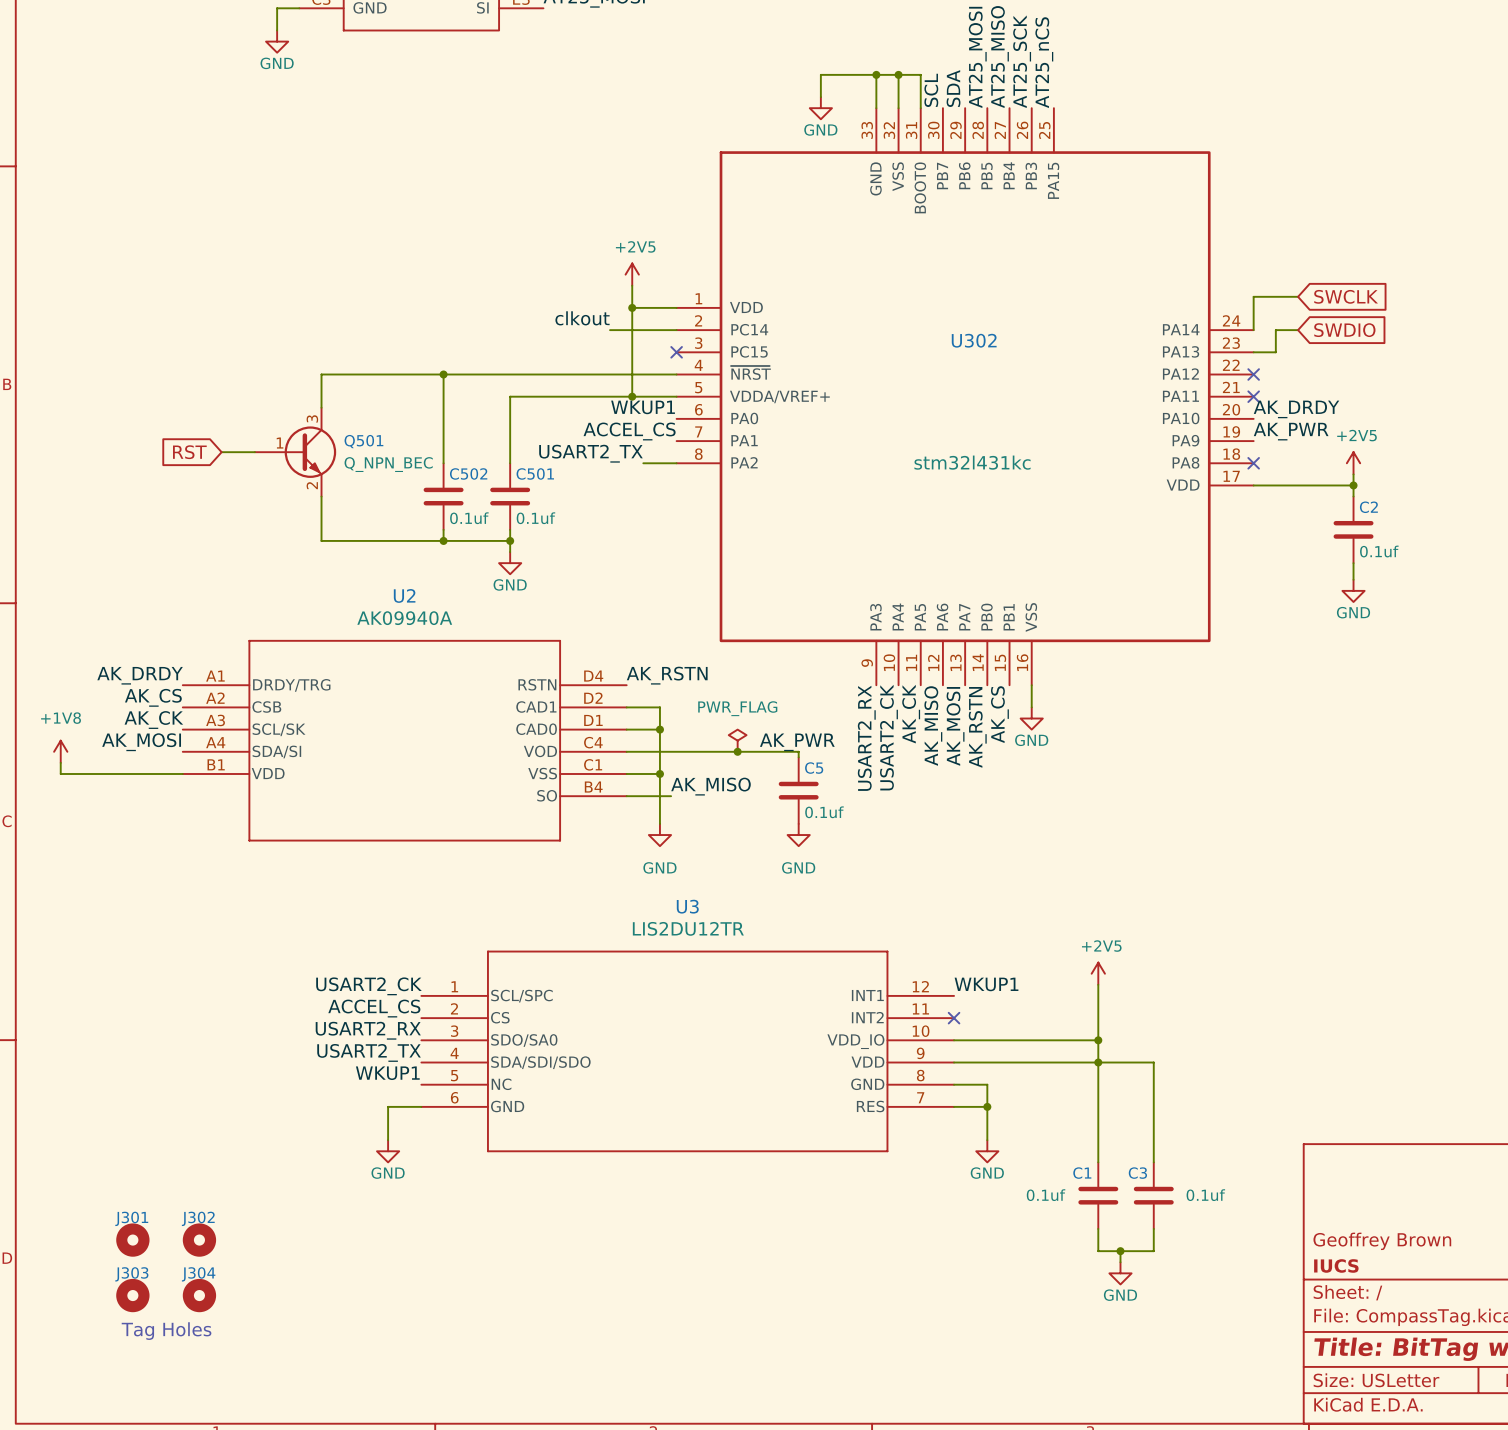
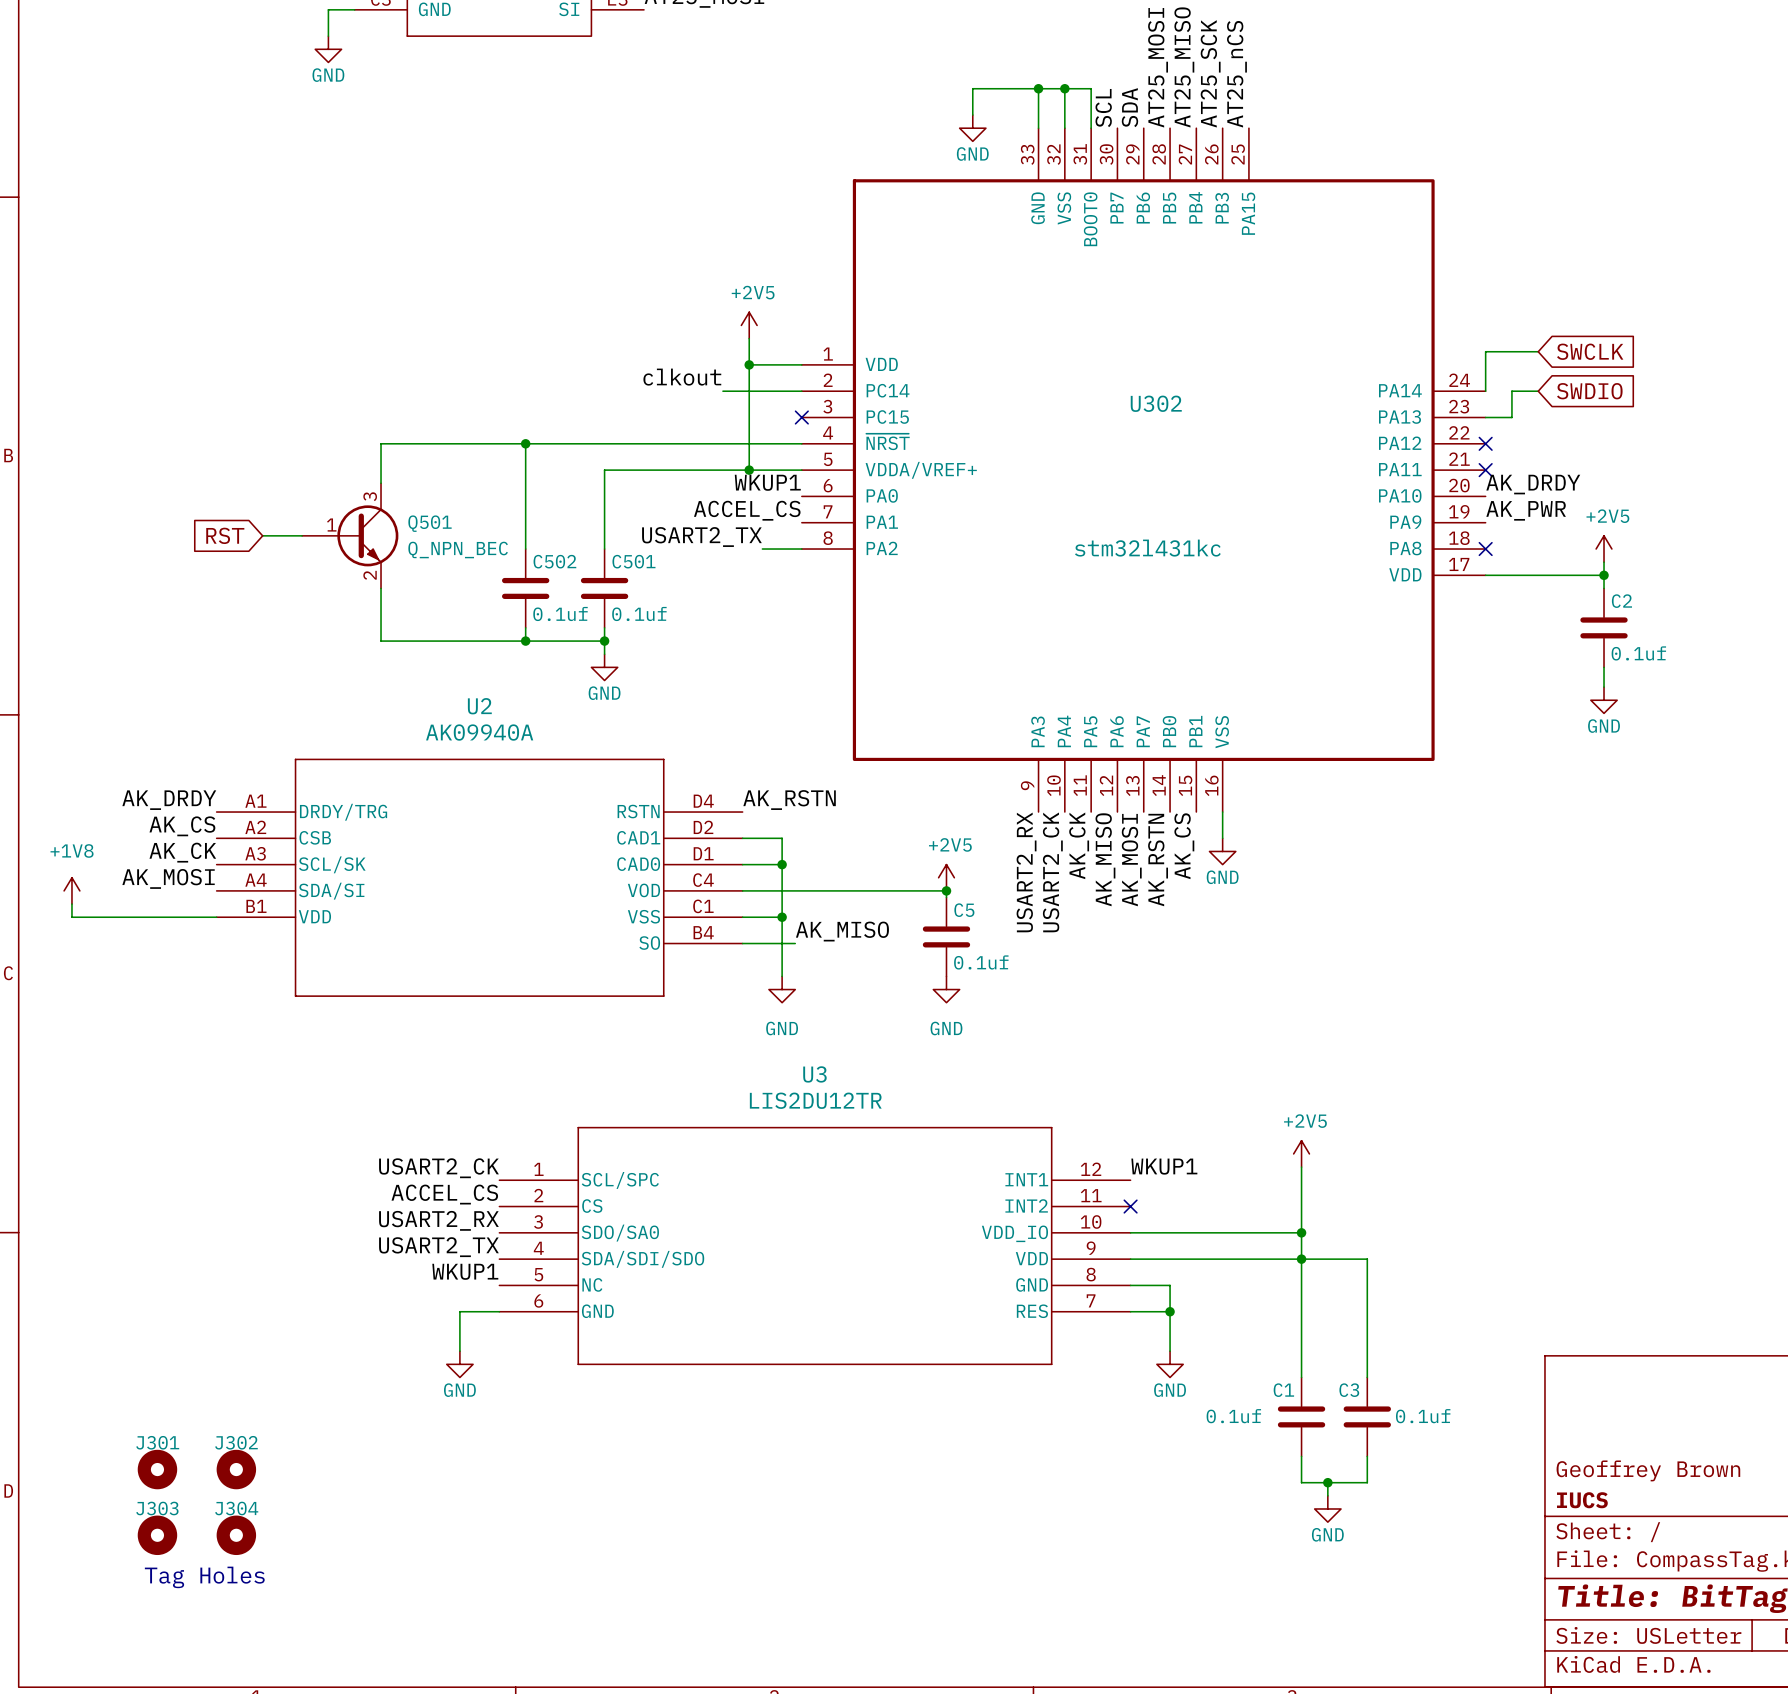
power symbol: PWR_FLAG (737, 740) -> none
power symbol: none -> +2V5 (946, 877)
label: AK_PWR (797, 742) -> none
junction: (737, 751) -> none
junction: none -> (946, 890)

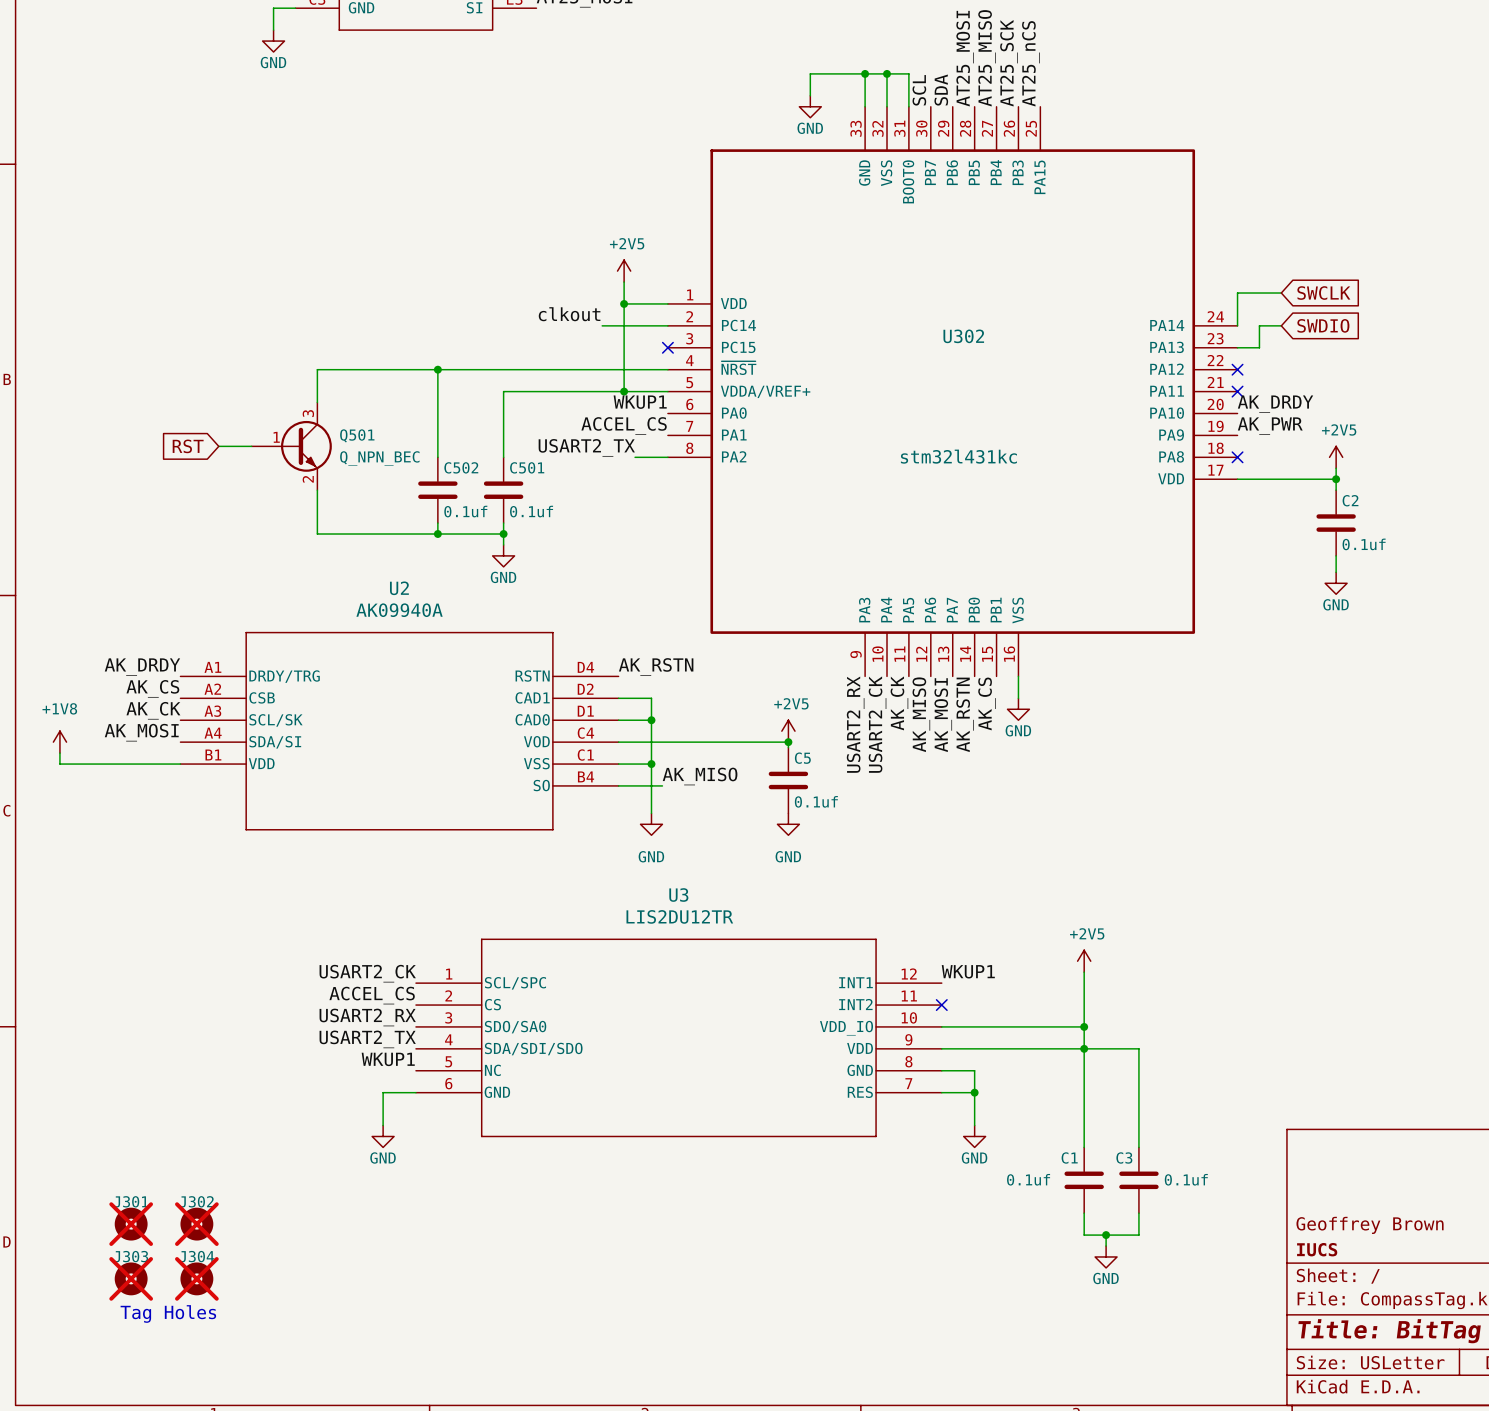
J301 do-not-place cross: none -> (131, 1224)
J302 do-not-place cross: none -> (196, 1224)
J303 do-not-place cross: none -> (131, 1278)
J304 do-not-place cross: none -> (196, 1278)

